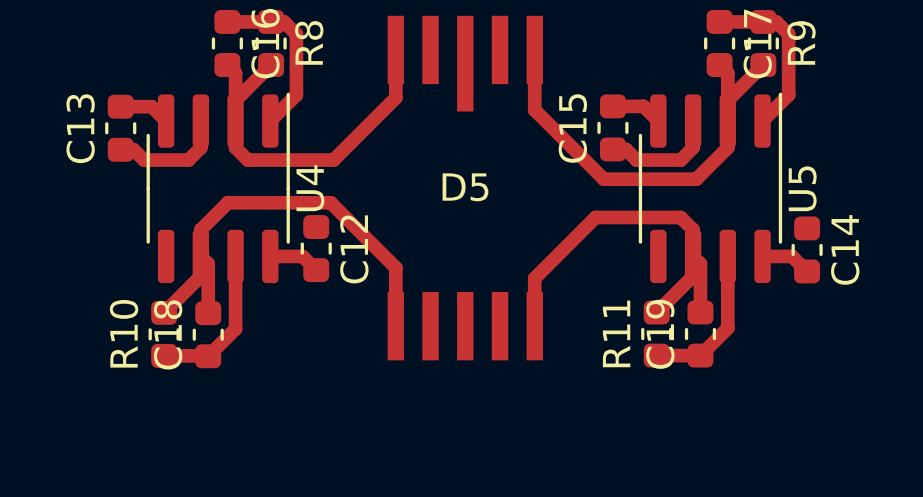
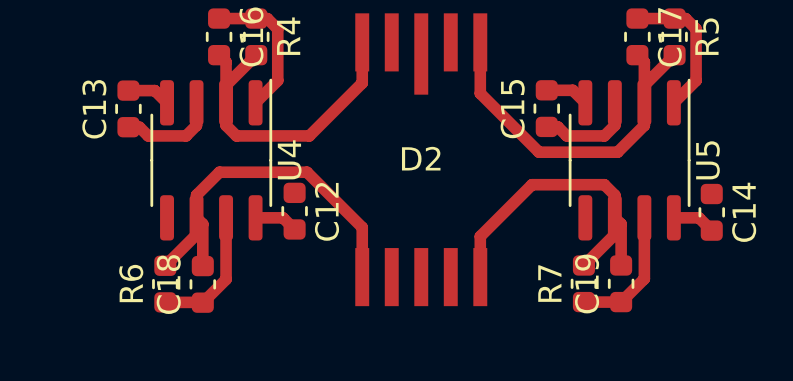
R8 name: R8 (309, 42) -> R4 (288, 36)
R9 name: R9 (801, 42) -> R5 (707, 36)
D5 name: D5 (465, 187) -> D2 (421, 158)
R10 name: R10 (124, 333) -> R6 (131, 283)
R11 name: R11 (616, 333) -> R7 (549, 283)

